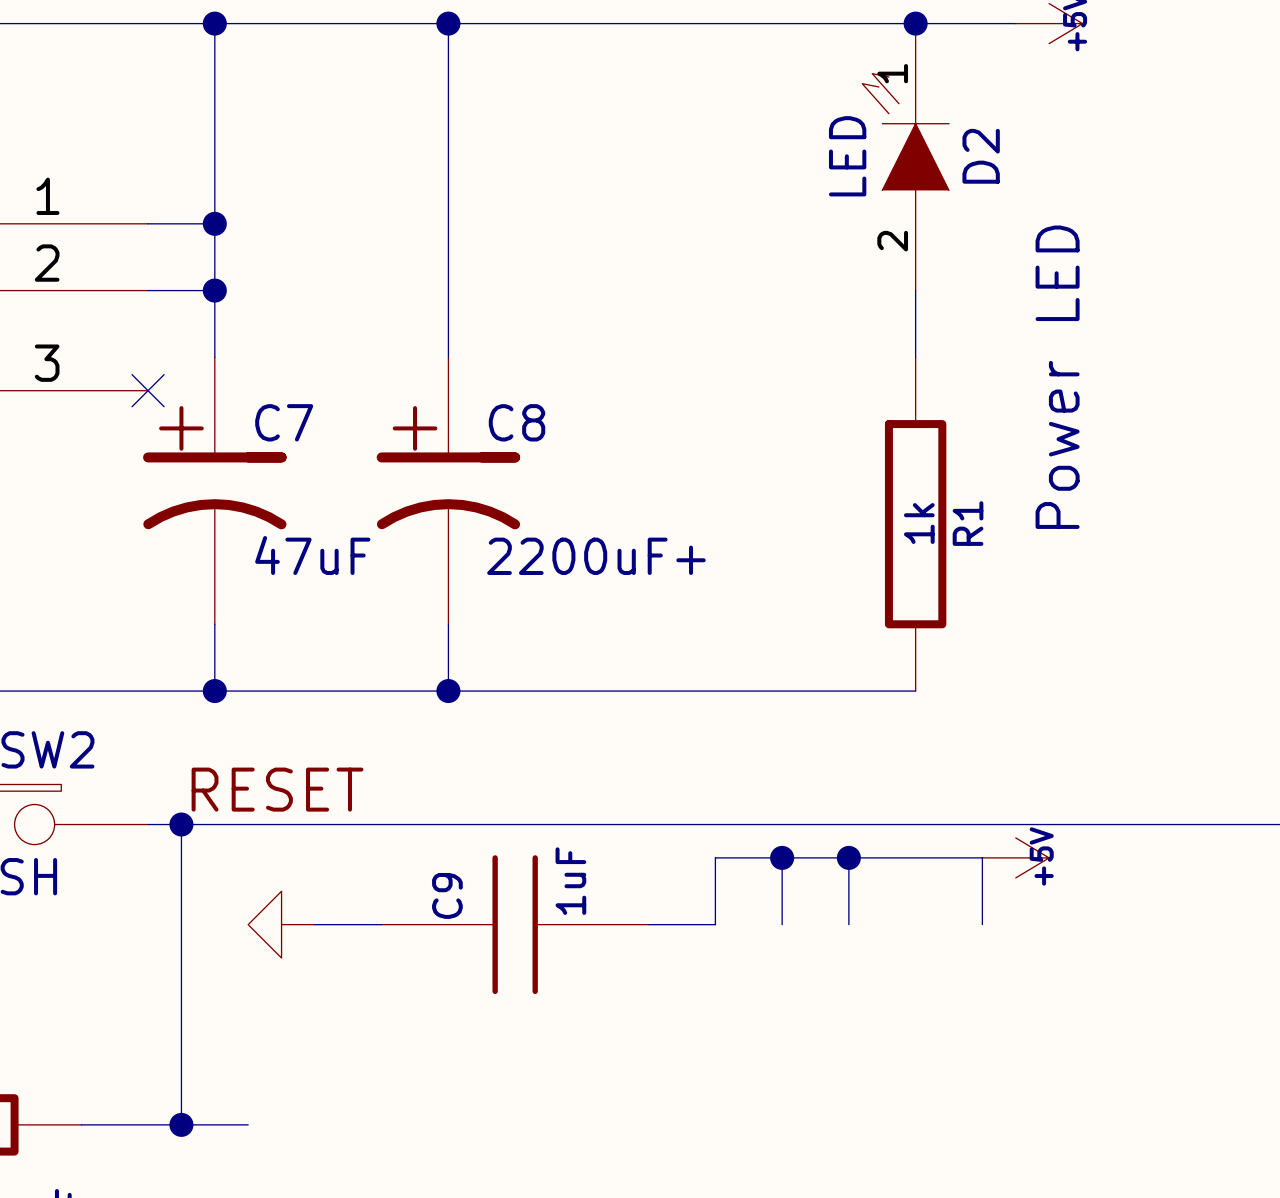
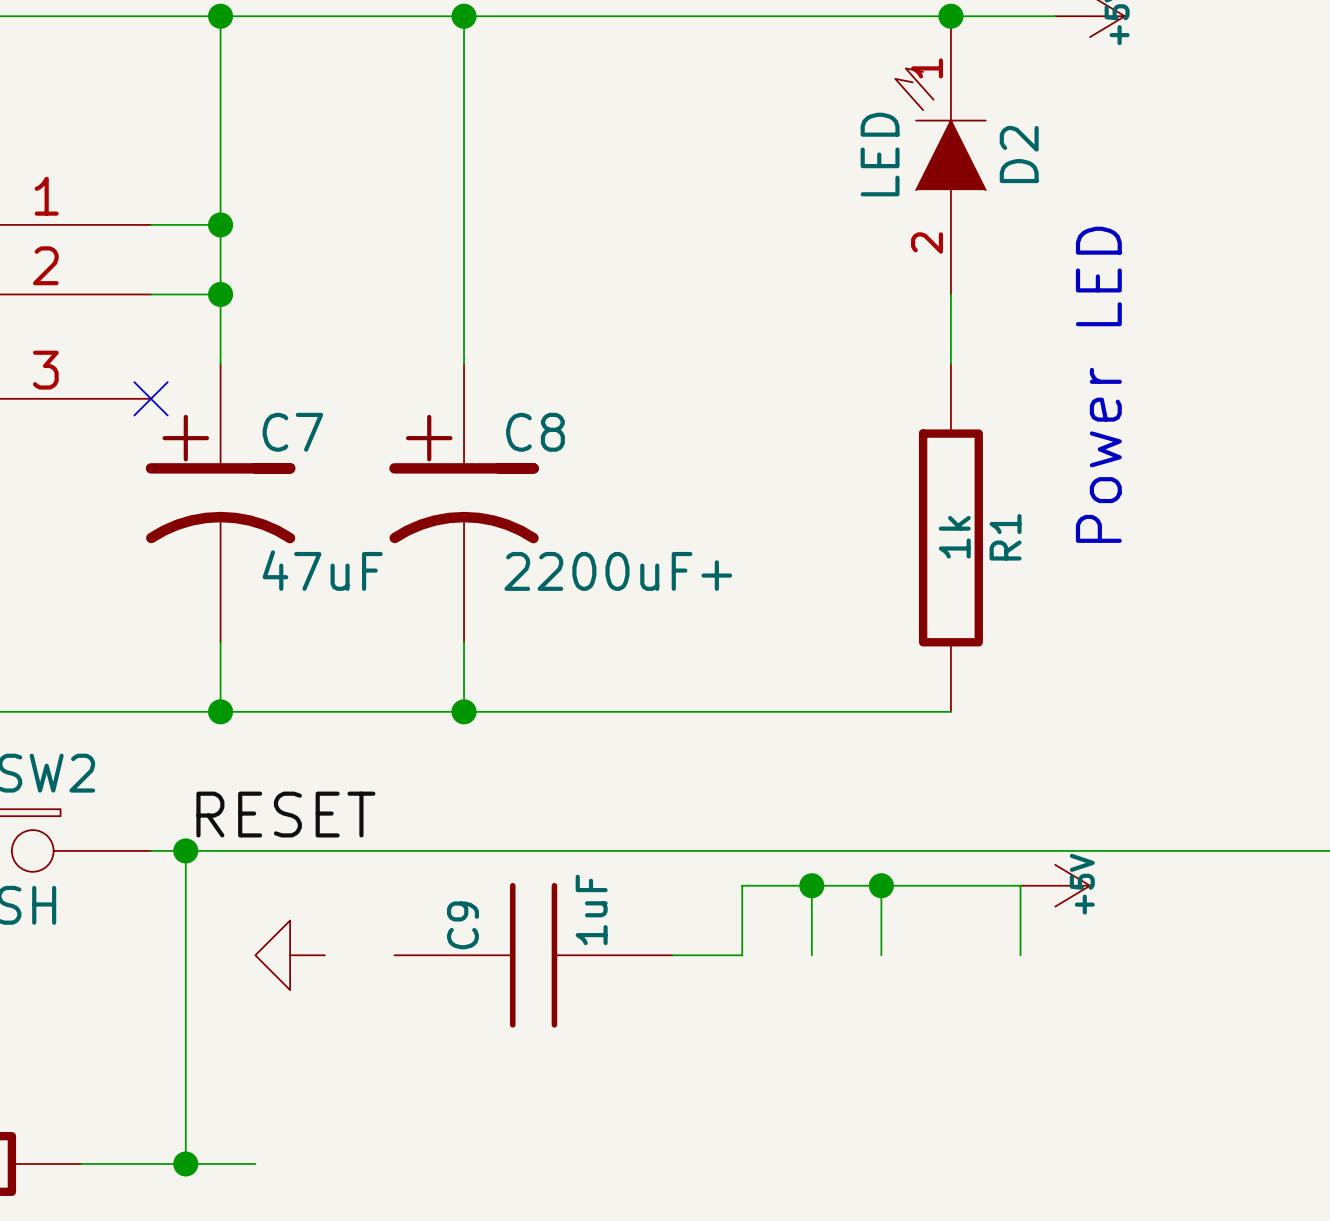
wire: (314, 924) (381, 924) -> none

